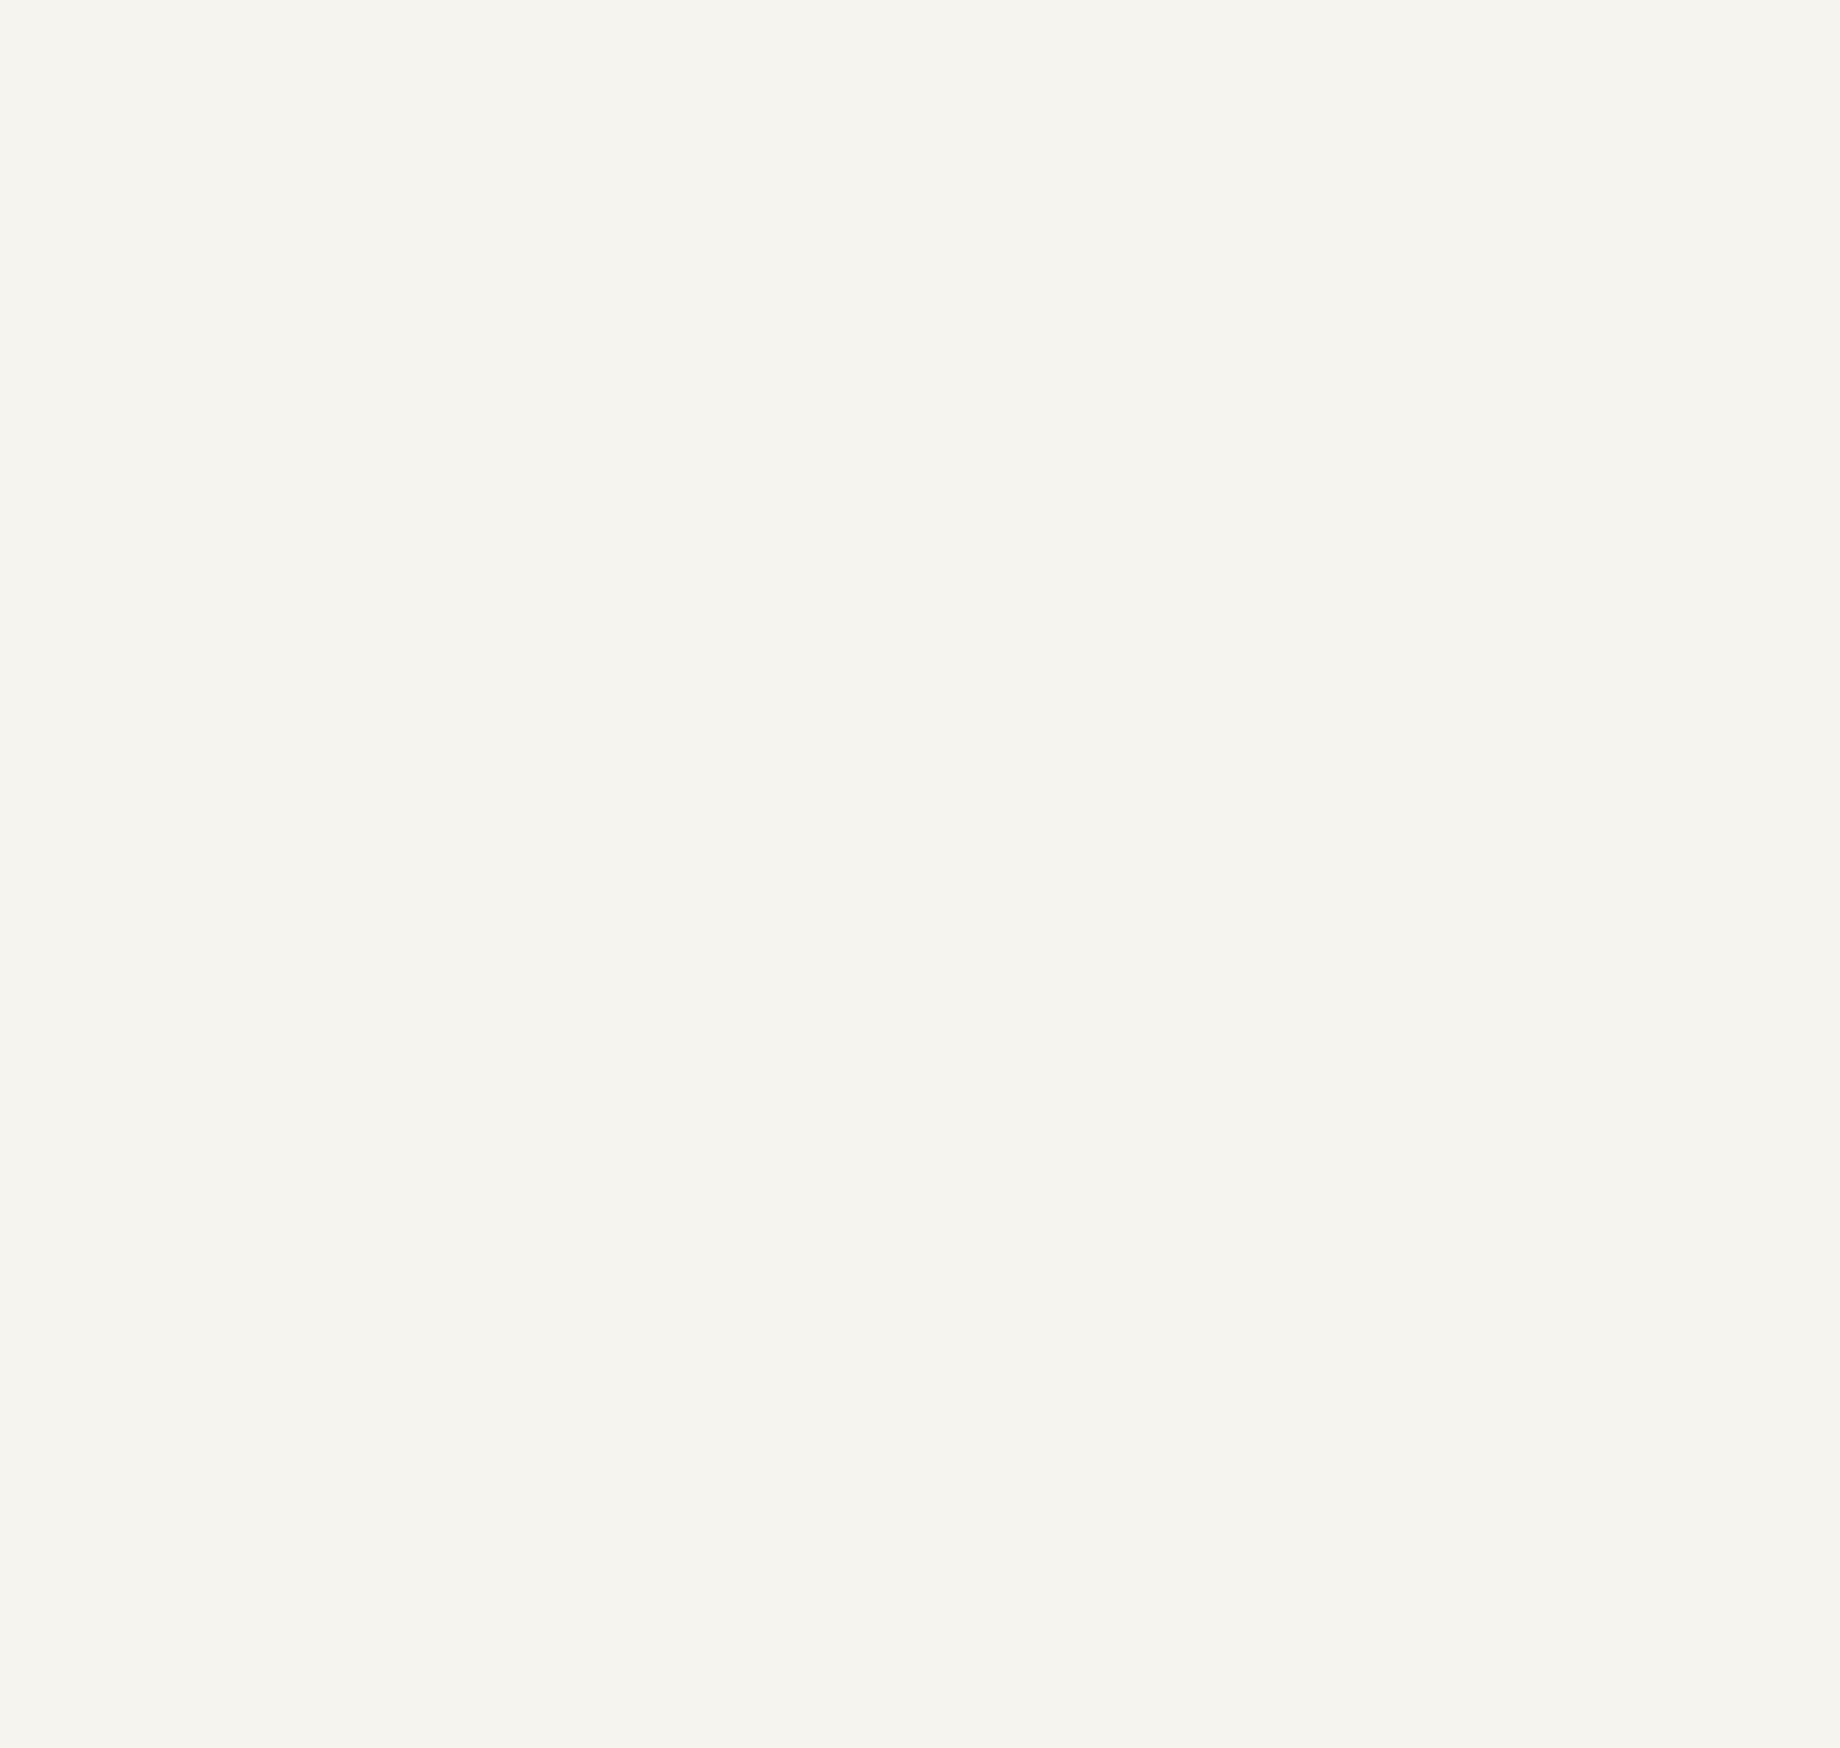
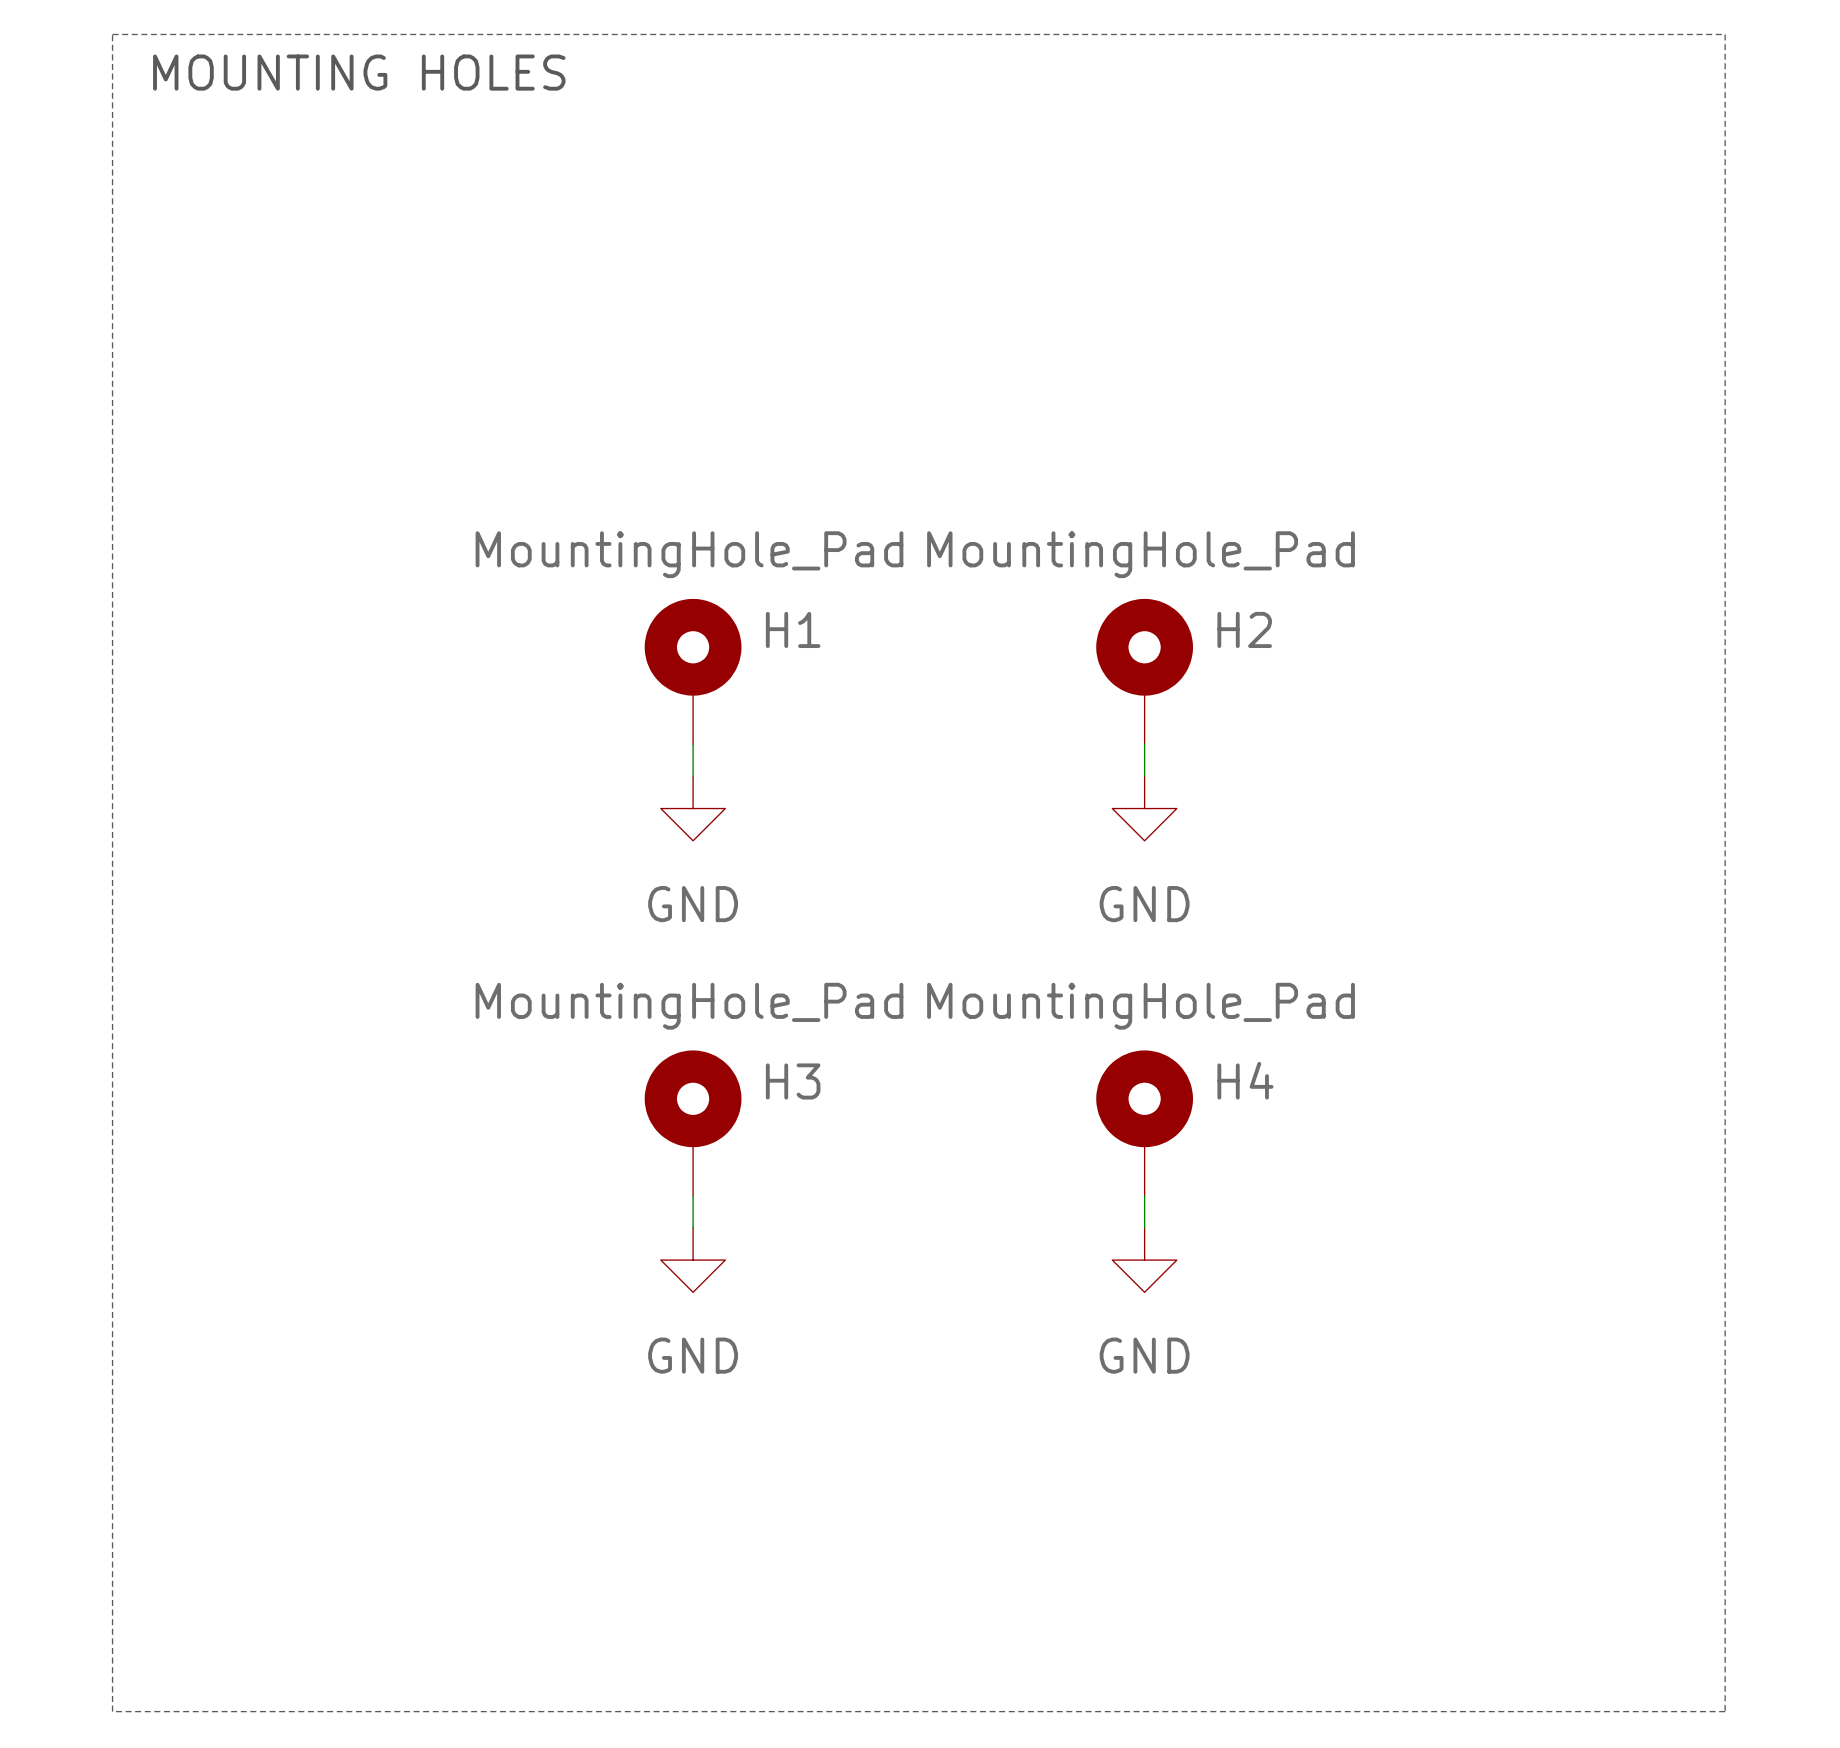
line: none -> (112, 34) (1725, 34) (1725, 1711) (112, 1711) (112, 34)
text: none -> MOUNTING HOLES (359, 72)
H1: none -> MountingHole_Pad (693, 671)
H2: none -> MountingHole_Pad (1144, 671)
wire: none -> (693, 744) (693, 776)
wire: none -> (1144, 744) (1144, 776)
power symbol: none -> GND (693, 808)
power symbol: none -> GND (1144, 808)
H3: none -> MountingHole_Pad (693, 1123)
H4: none -> MountingHole_Pad (1144, 1123)
wire: none -> (693, 1195) (693, 1227)
wire: none -> (1144, 1195) (1144, 1227)
power symbol: none -> GND (693, 1260)
power symbol: none -> GND (1144, 1260)

